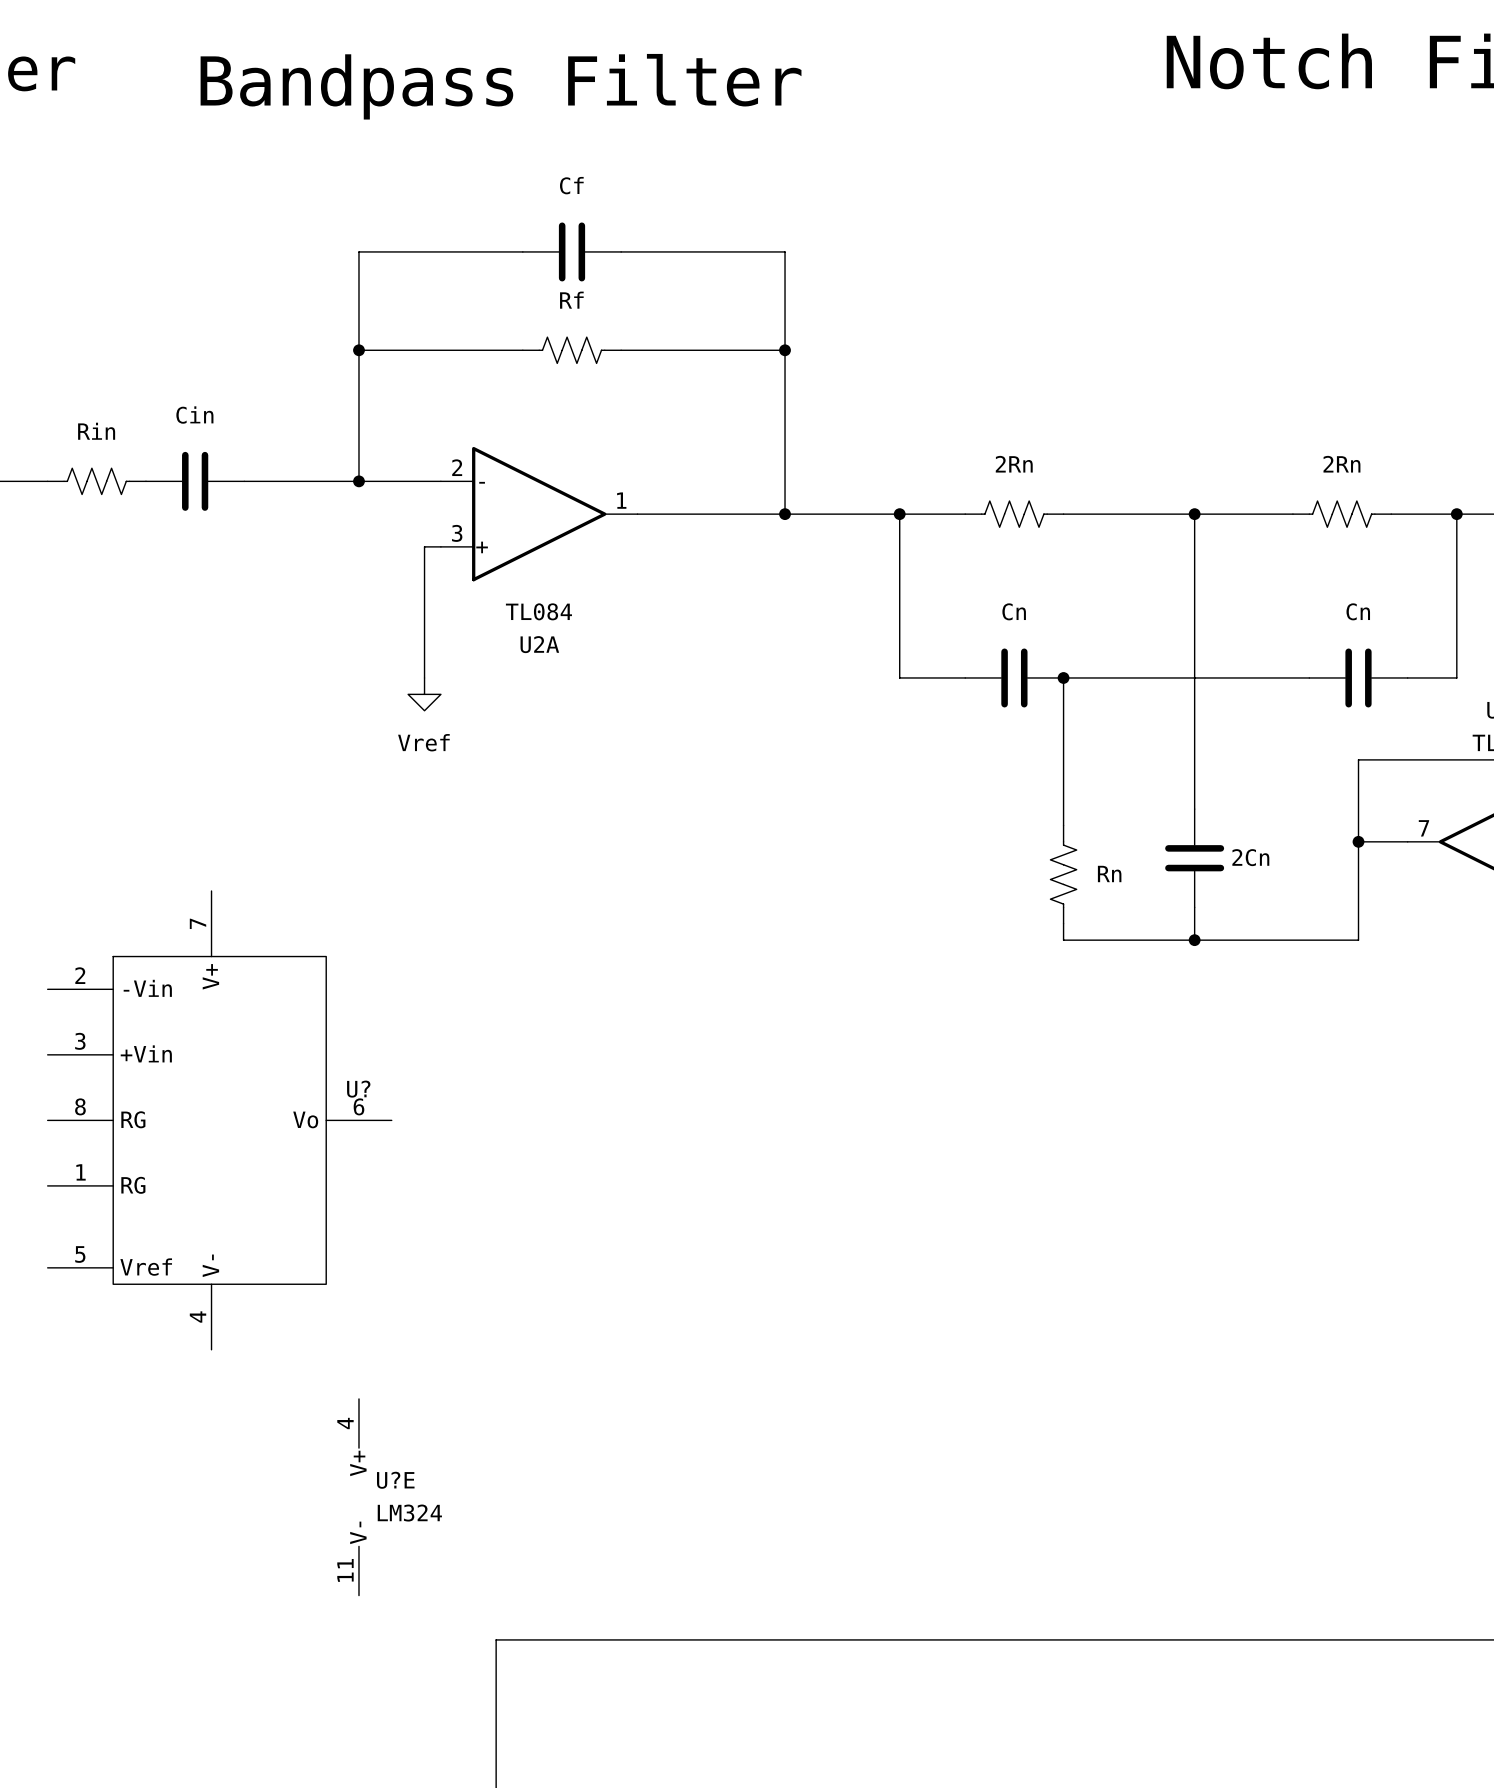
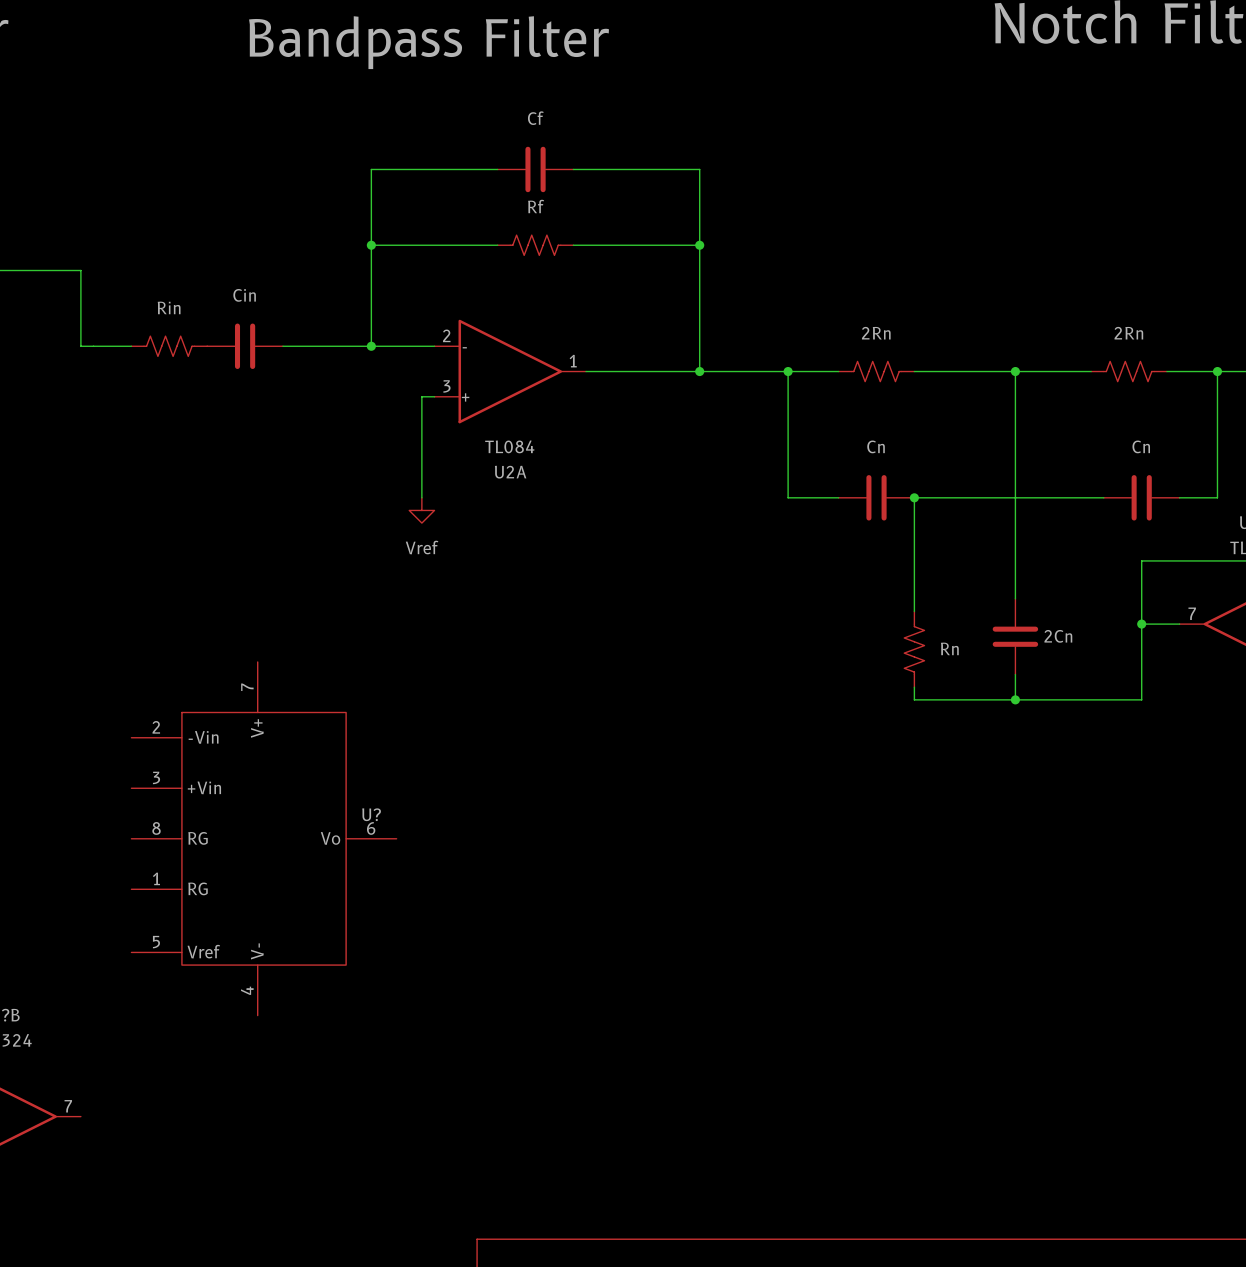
U?E: LM324 (358, 1497) -> none

